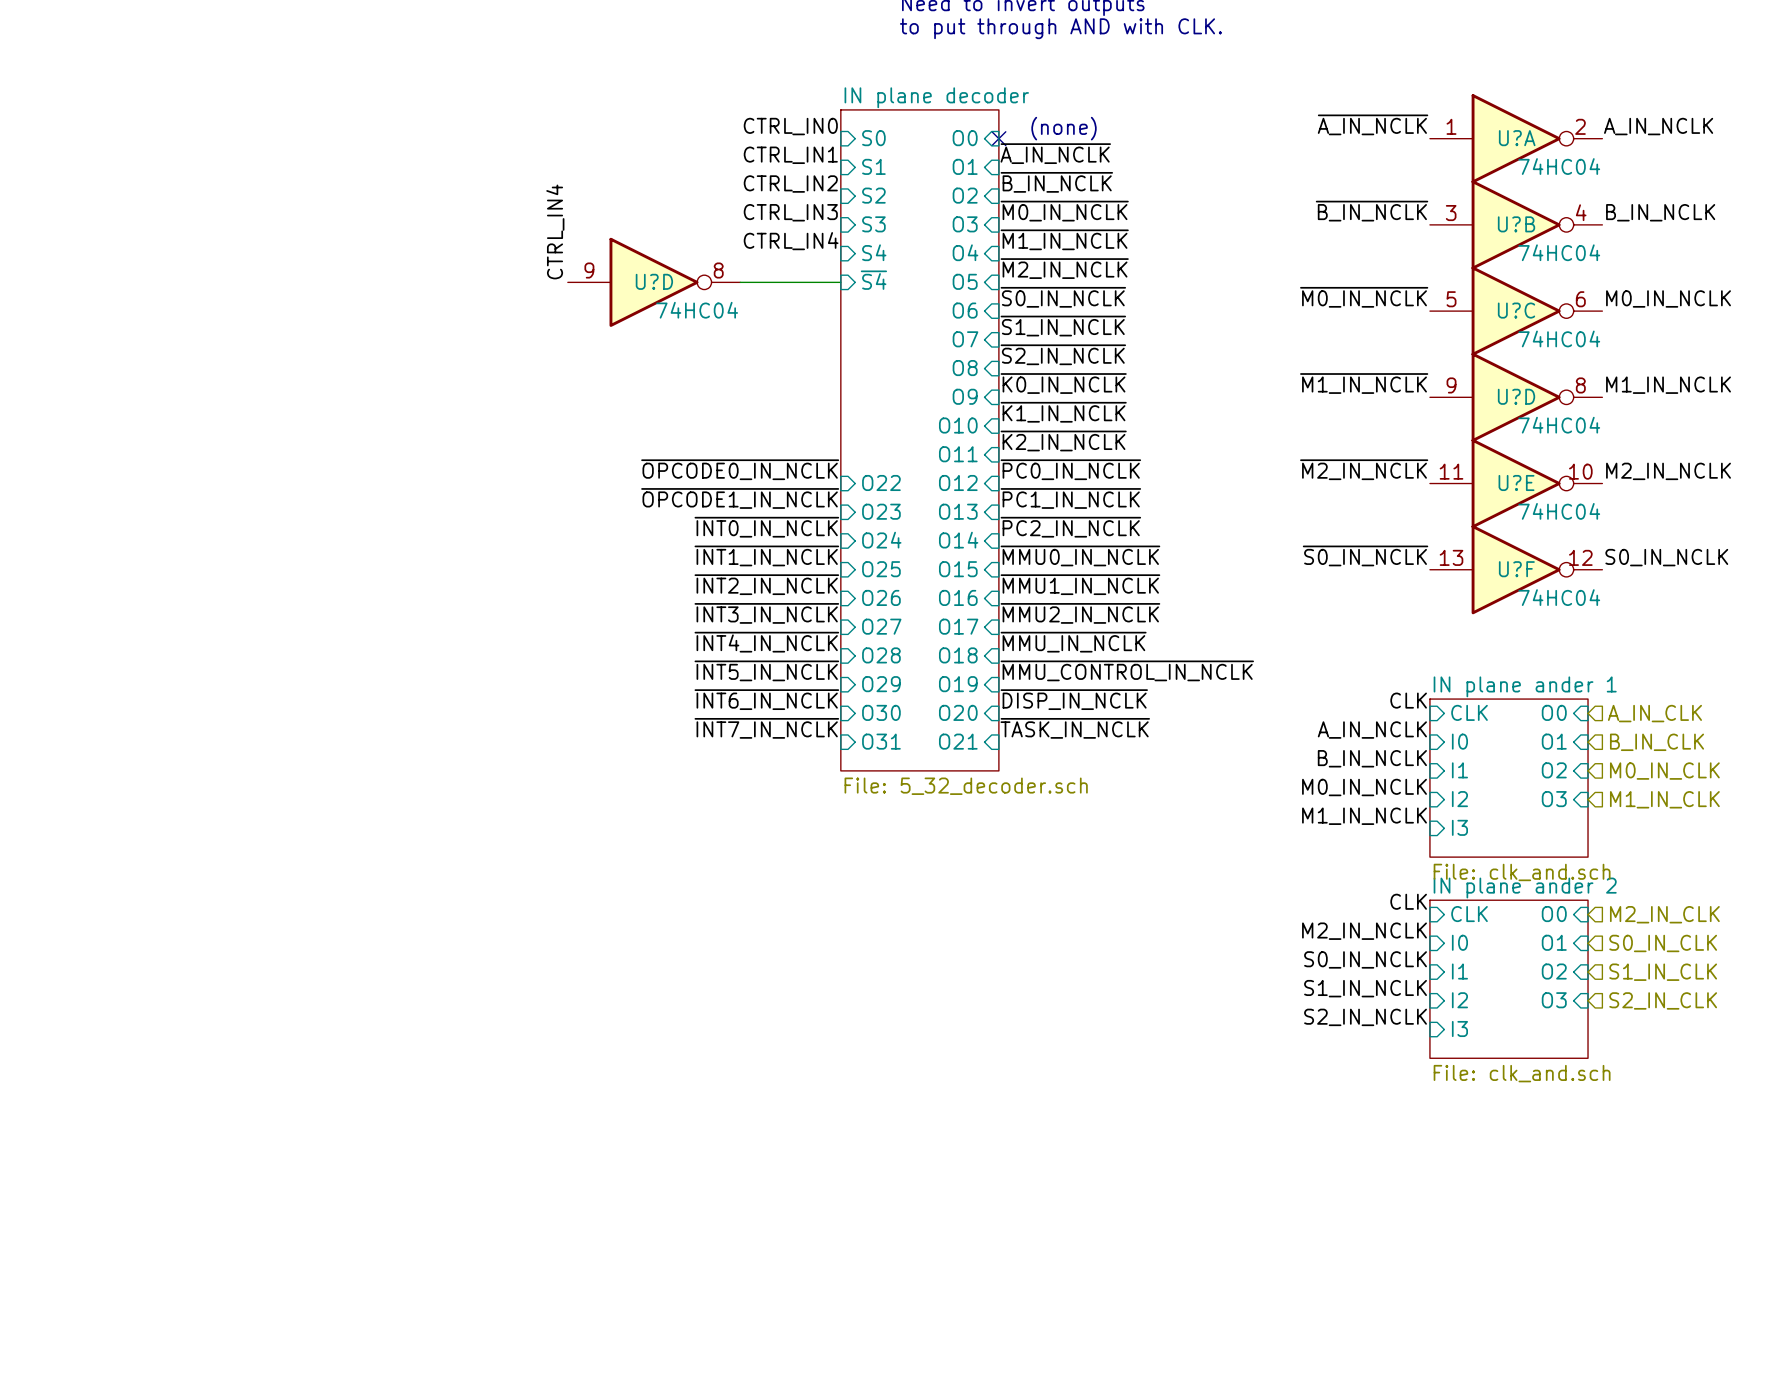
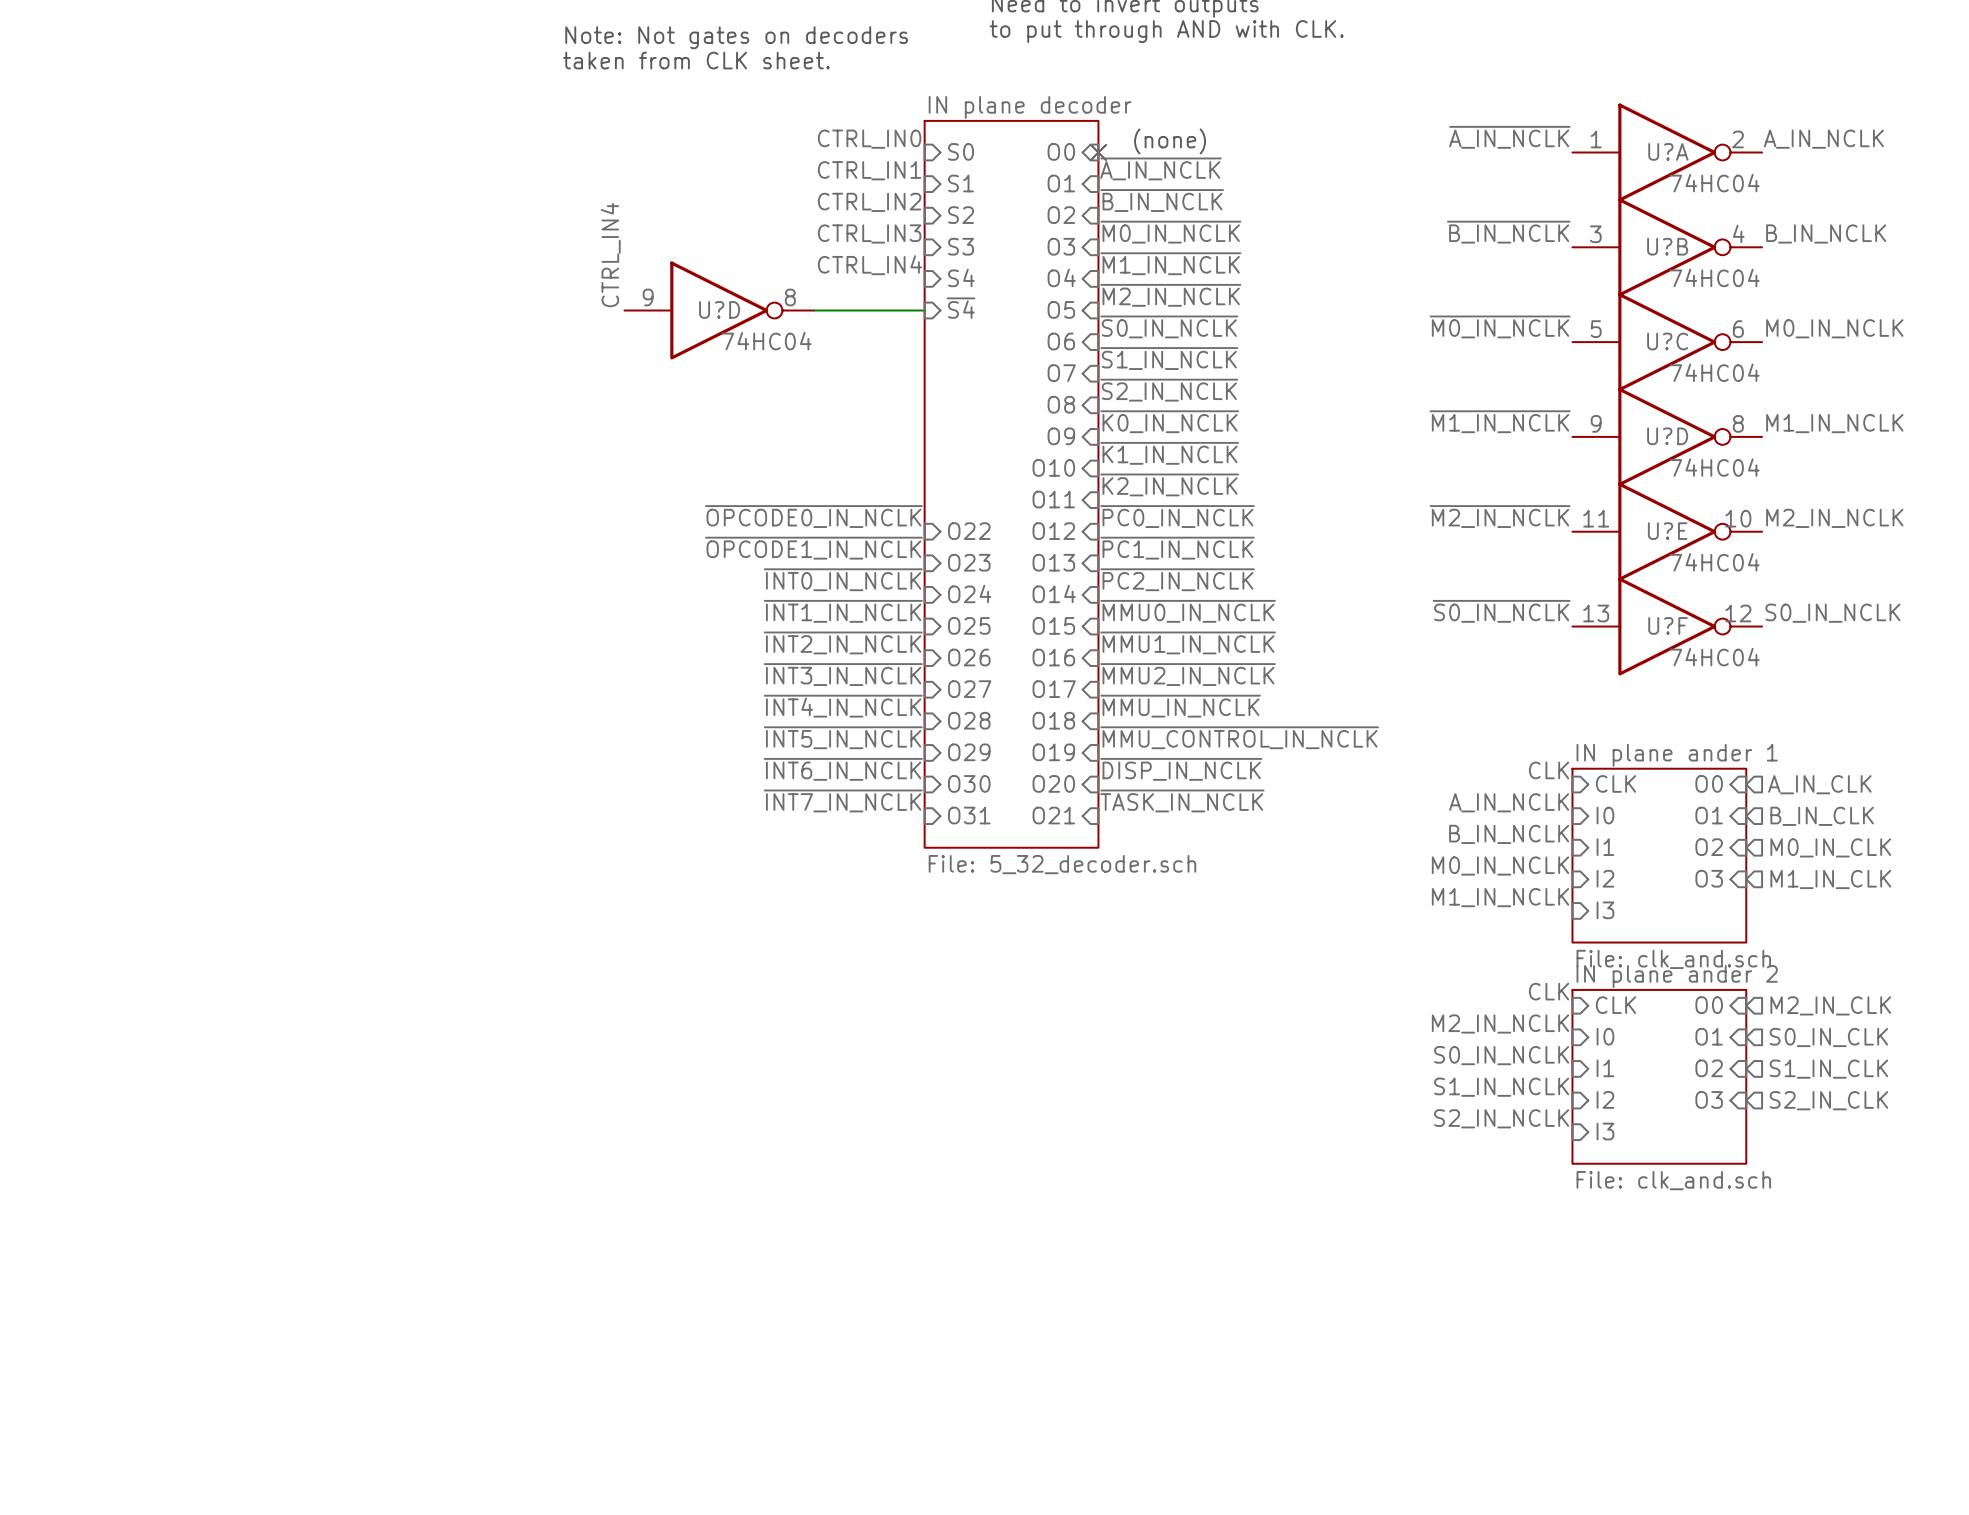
text: none -> Note: Not gates on decoders (736, 37)
text: none -> taken from CLK sheet. (696, 60)

